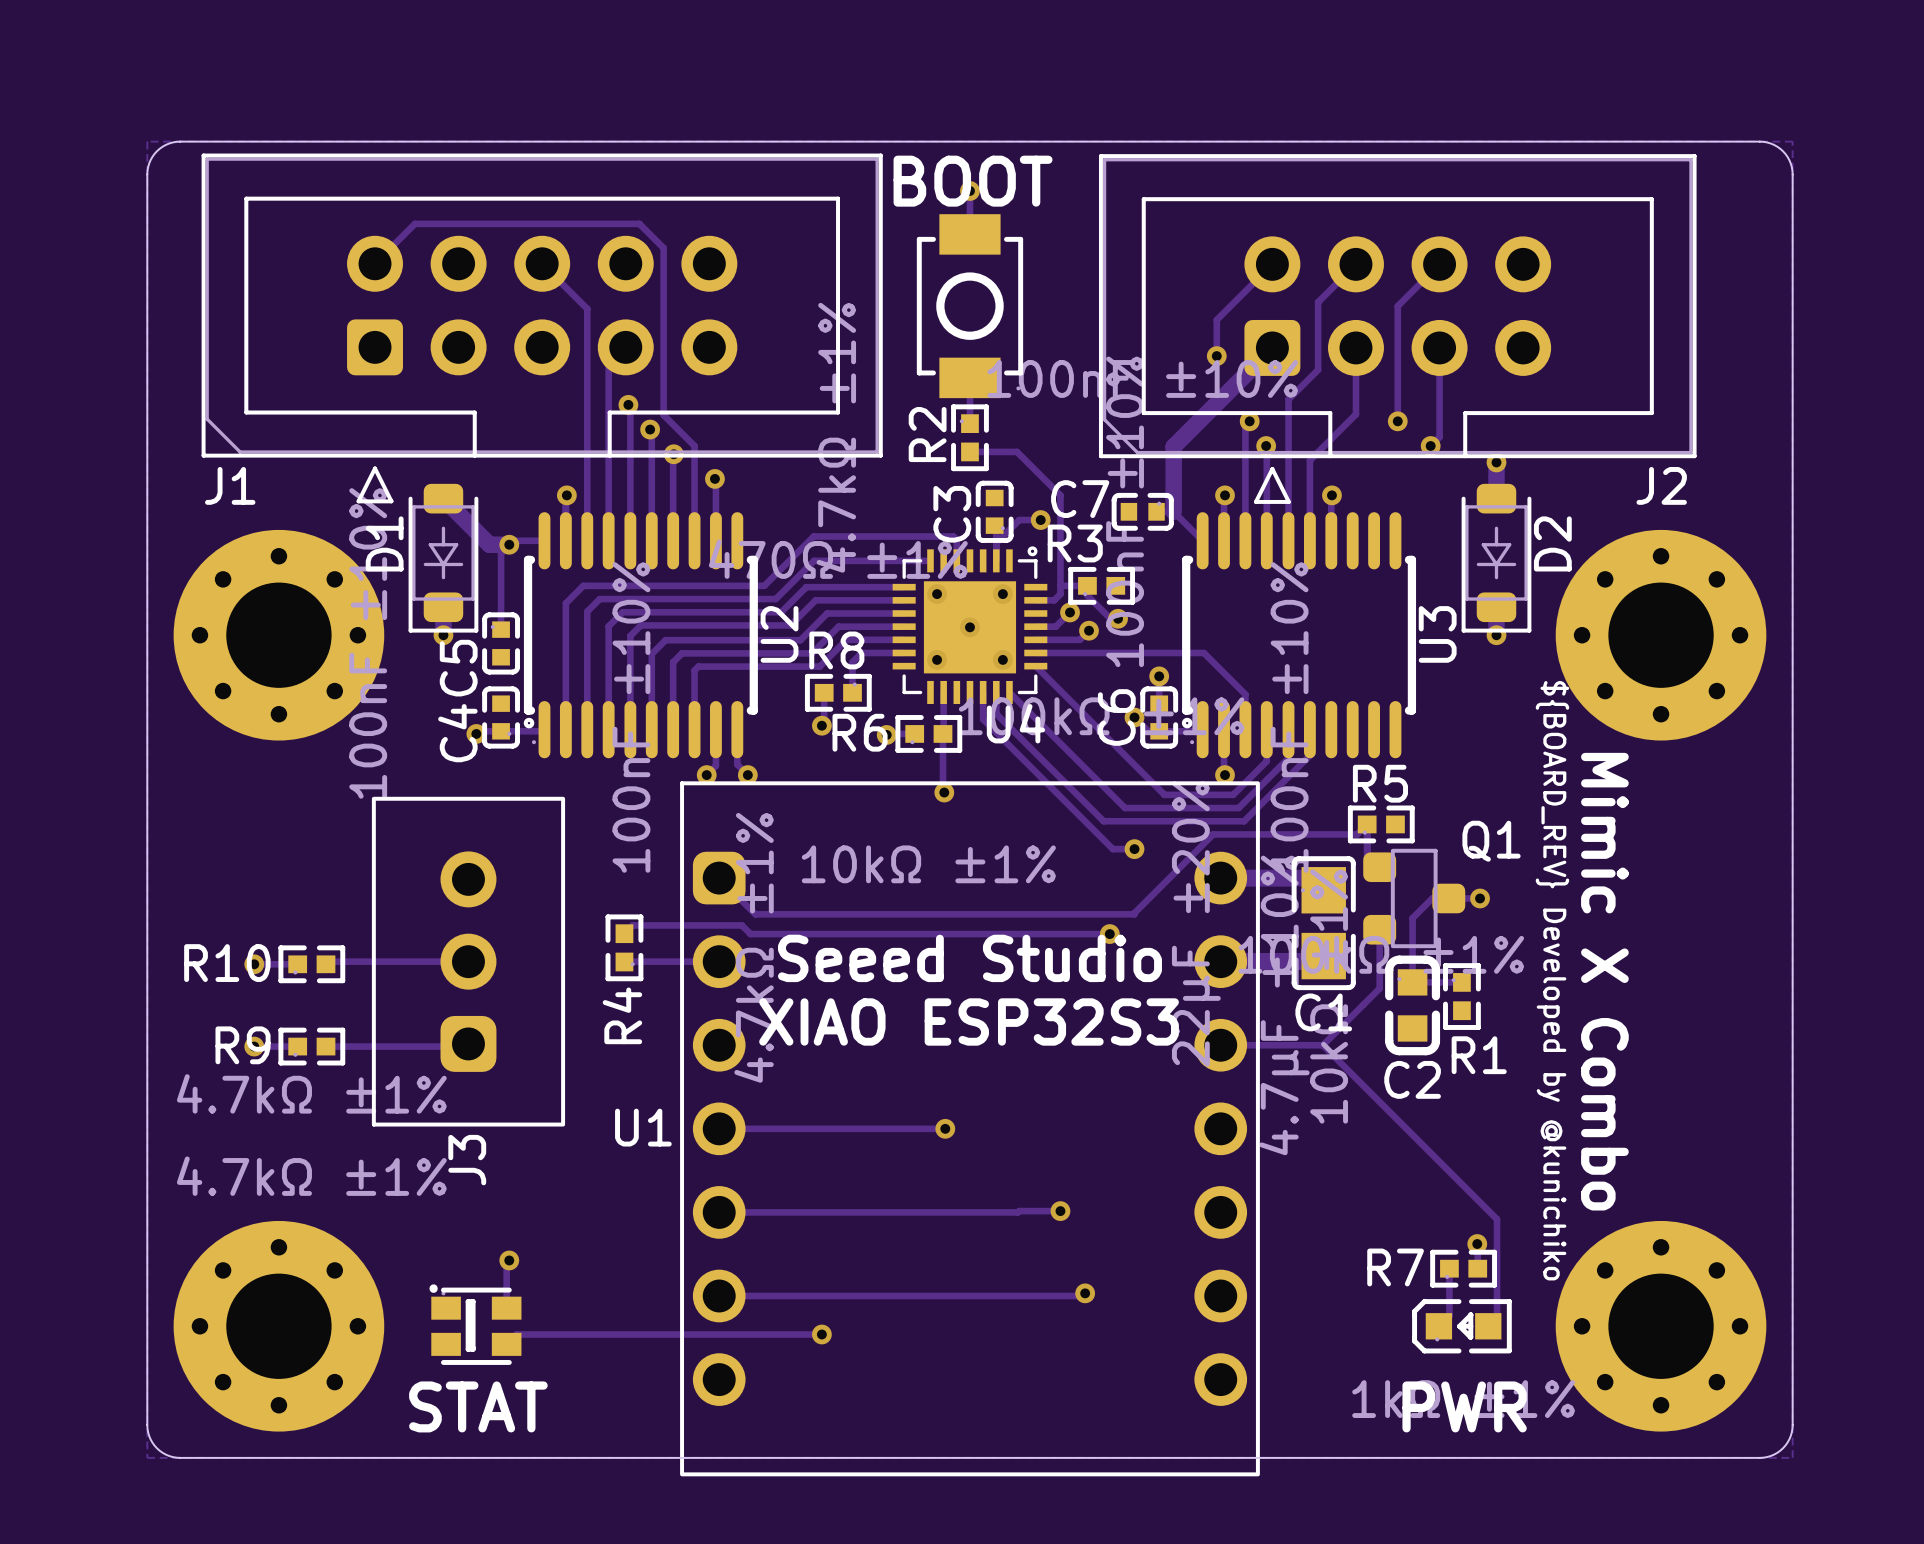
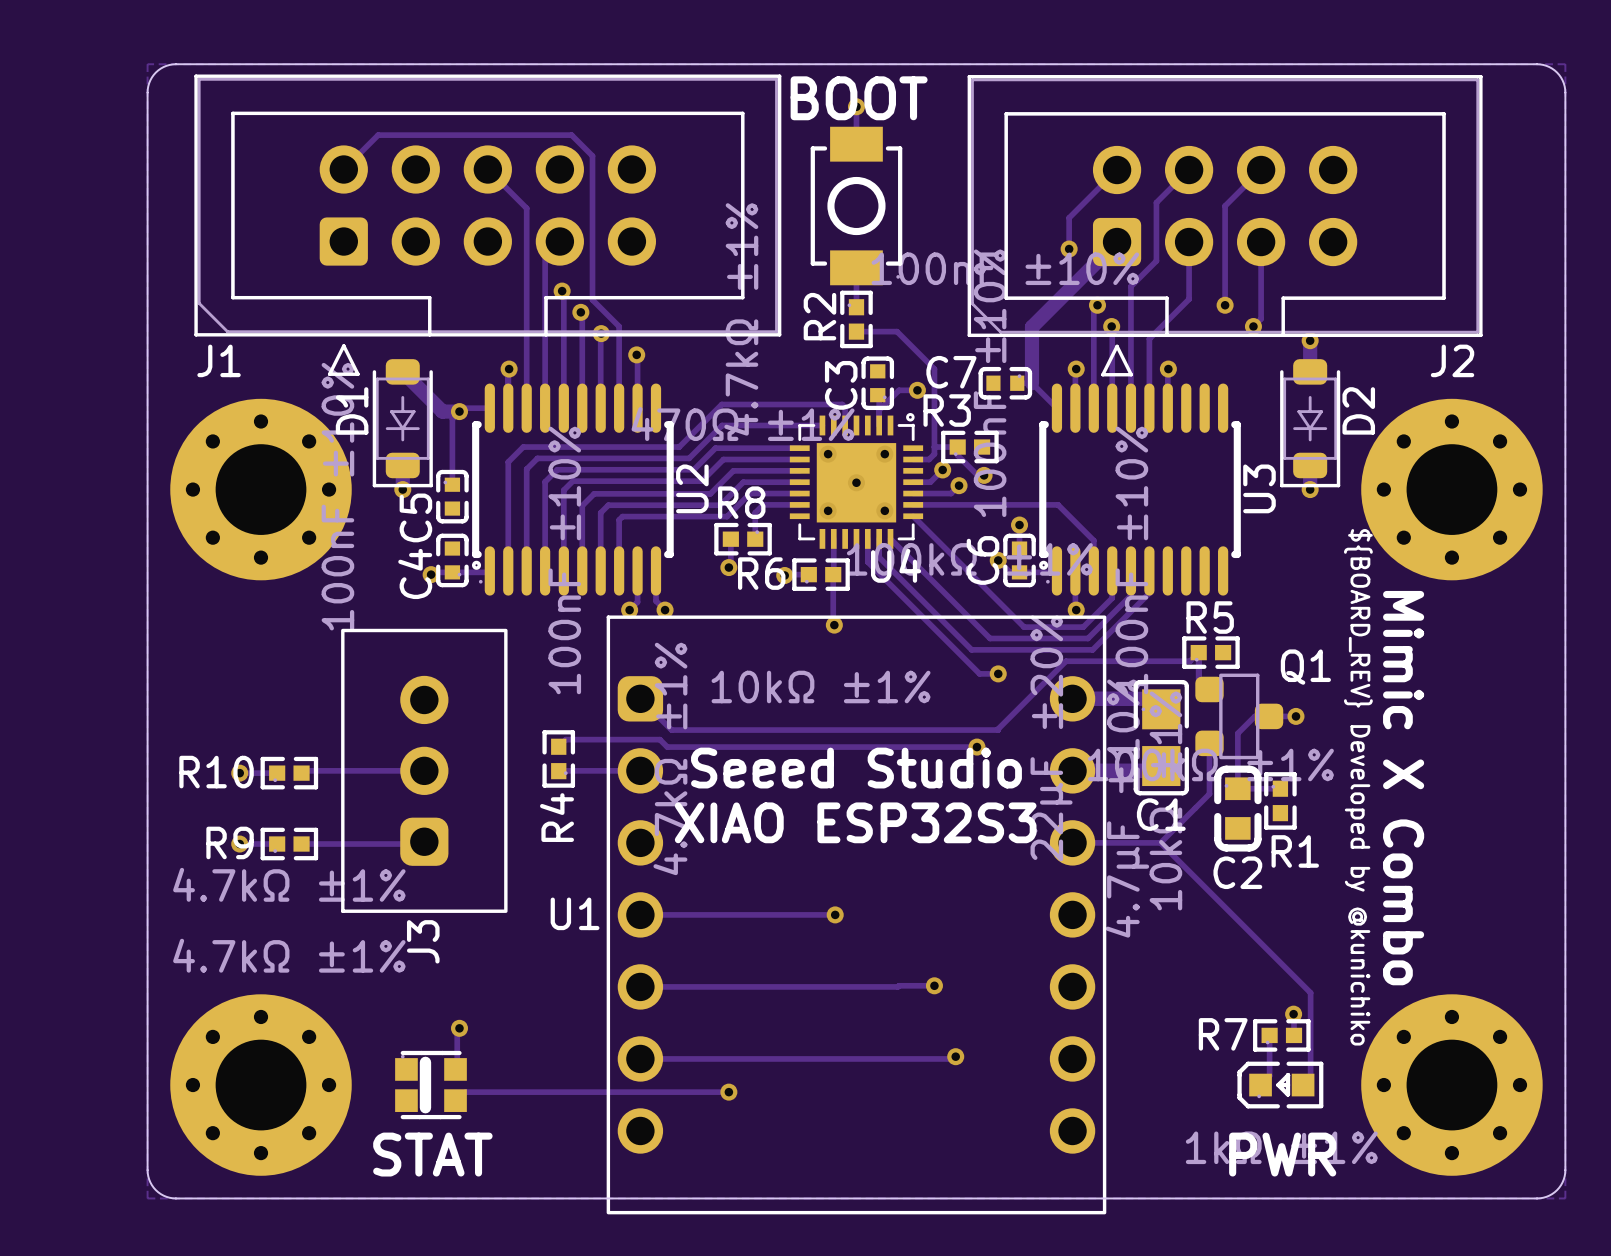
part footprint: [429, 1284, 522, 1365] -> [395, 1050, 467, 1120]

